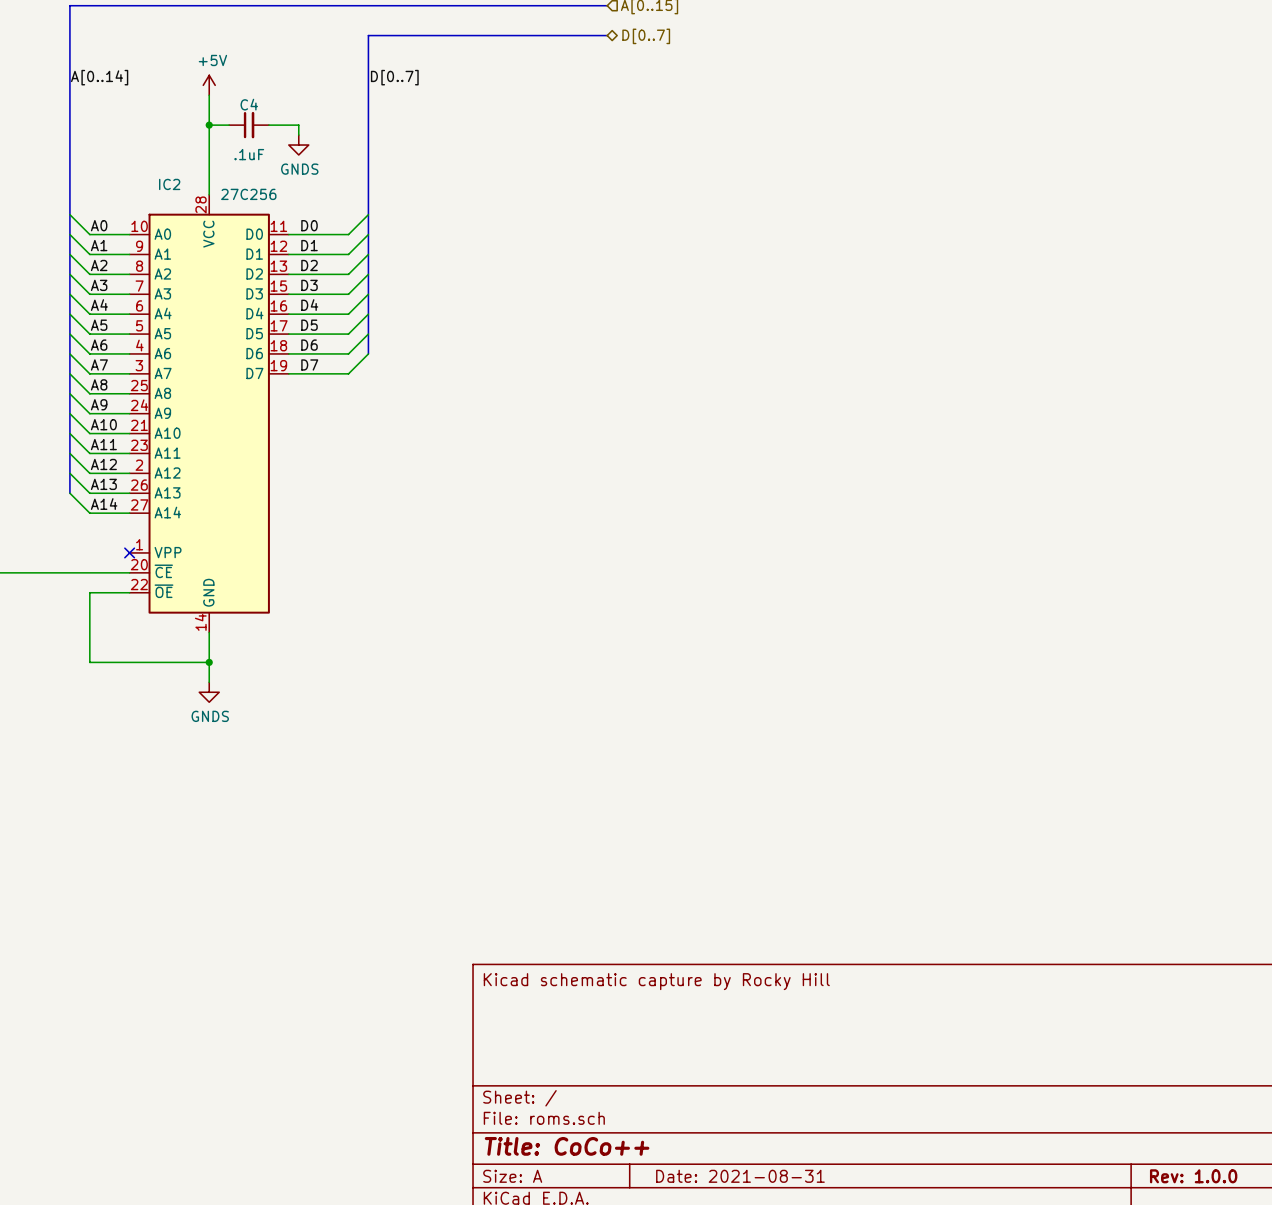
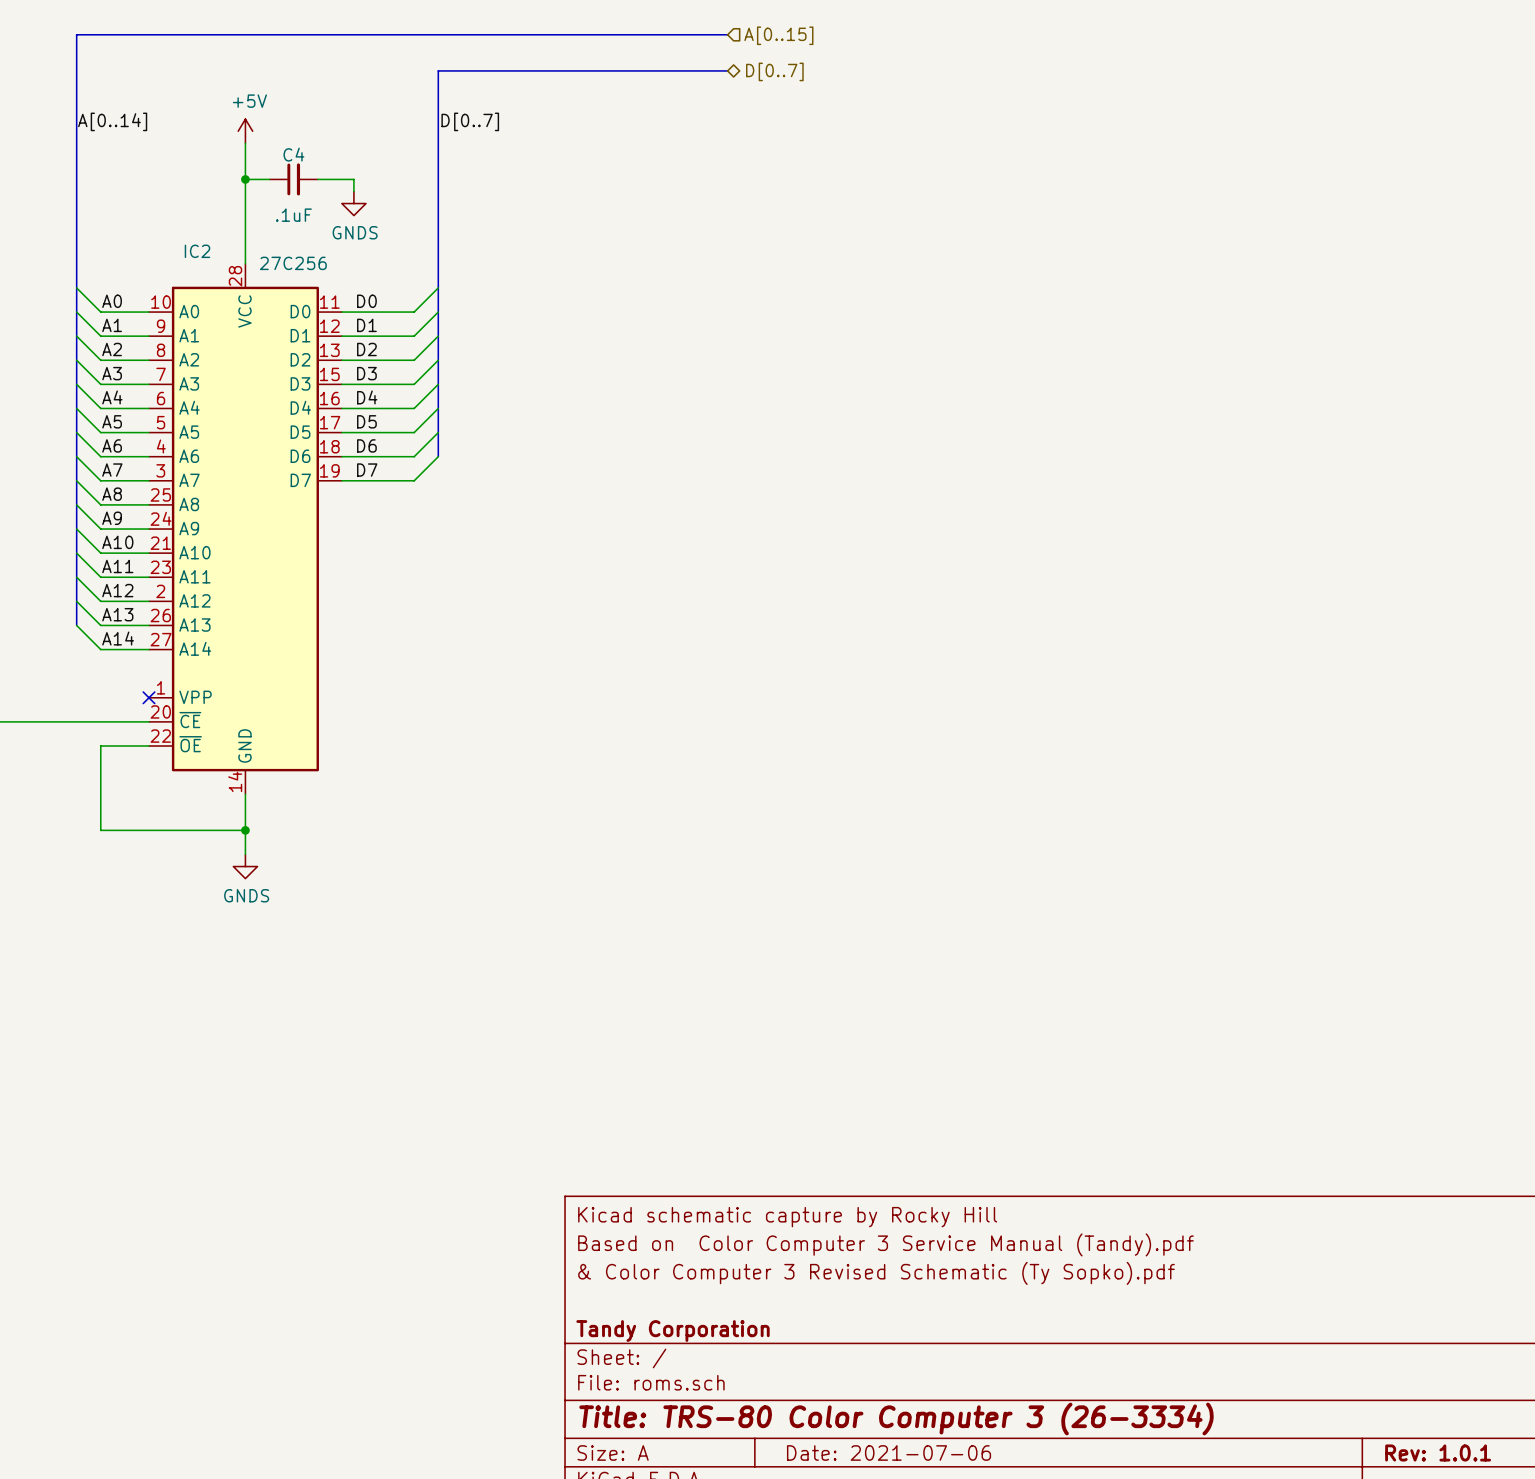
title block: none -> Based on Color Computer 3 Service Manual (Tandy).pdf (885, 1244)
title block: none -> & Color Computer 3 Revised Schematic (Ty Sopko).pdf (876, 1273)
title block: none -> Tandy Corporation (673, 1331)
title block: Title: CoCo++ (567, 1146) -> Title: TRS-80 Color Computer 3 (26-3334) (896, 1419)
title block: Date: 2021-08-31 (740, 1176) -> Date: 2021-07-06 (889, 1452)
title block: Rev: 1.0.0 (1193, 1176) -> Rev: 1.0.1 (1438, 1452)

